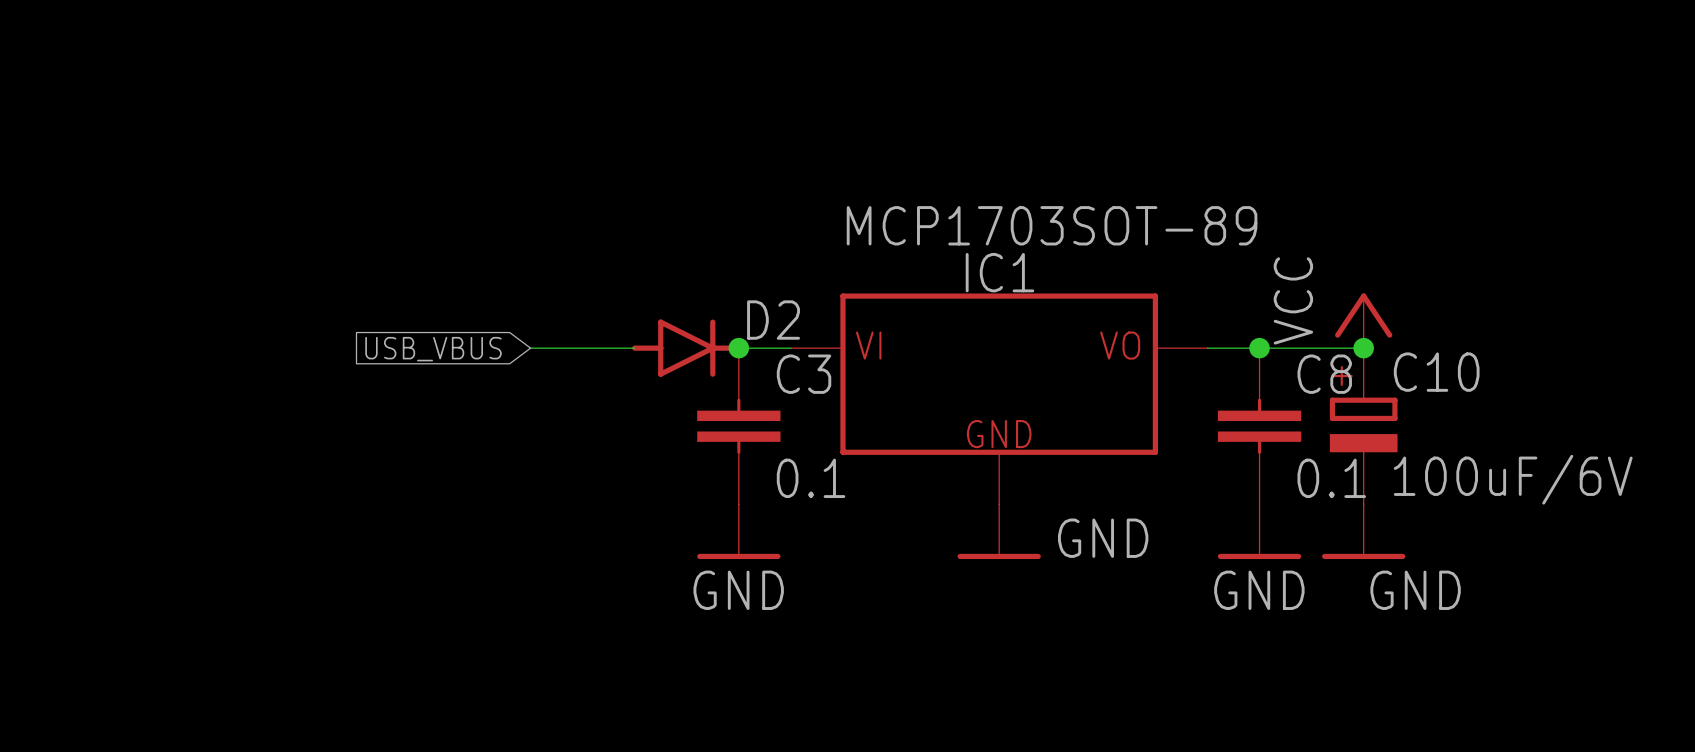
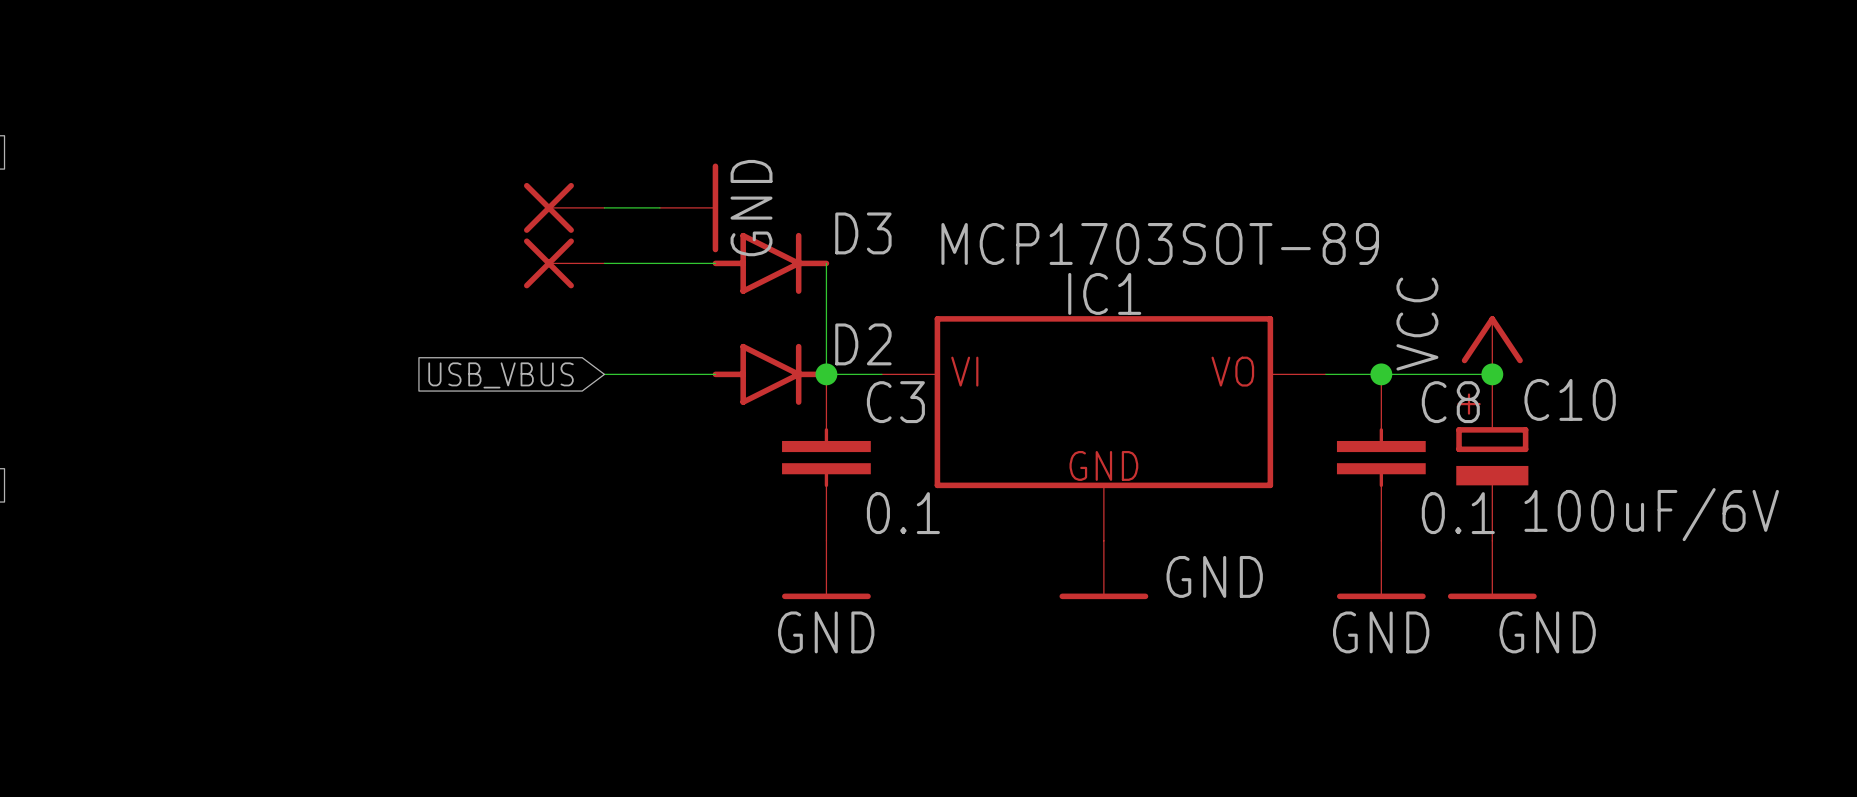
part: none -> (564, 207)
wire: none -> (604, 207) (659, 207)
power symbol: none -> GND (689, 207)
part: none -> (564, 263)
wire: none -> (604, 263) (715, 263)
D3: none -> (770, 263)
wire: none -> (826, 263) (826, 374)

